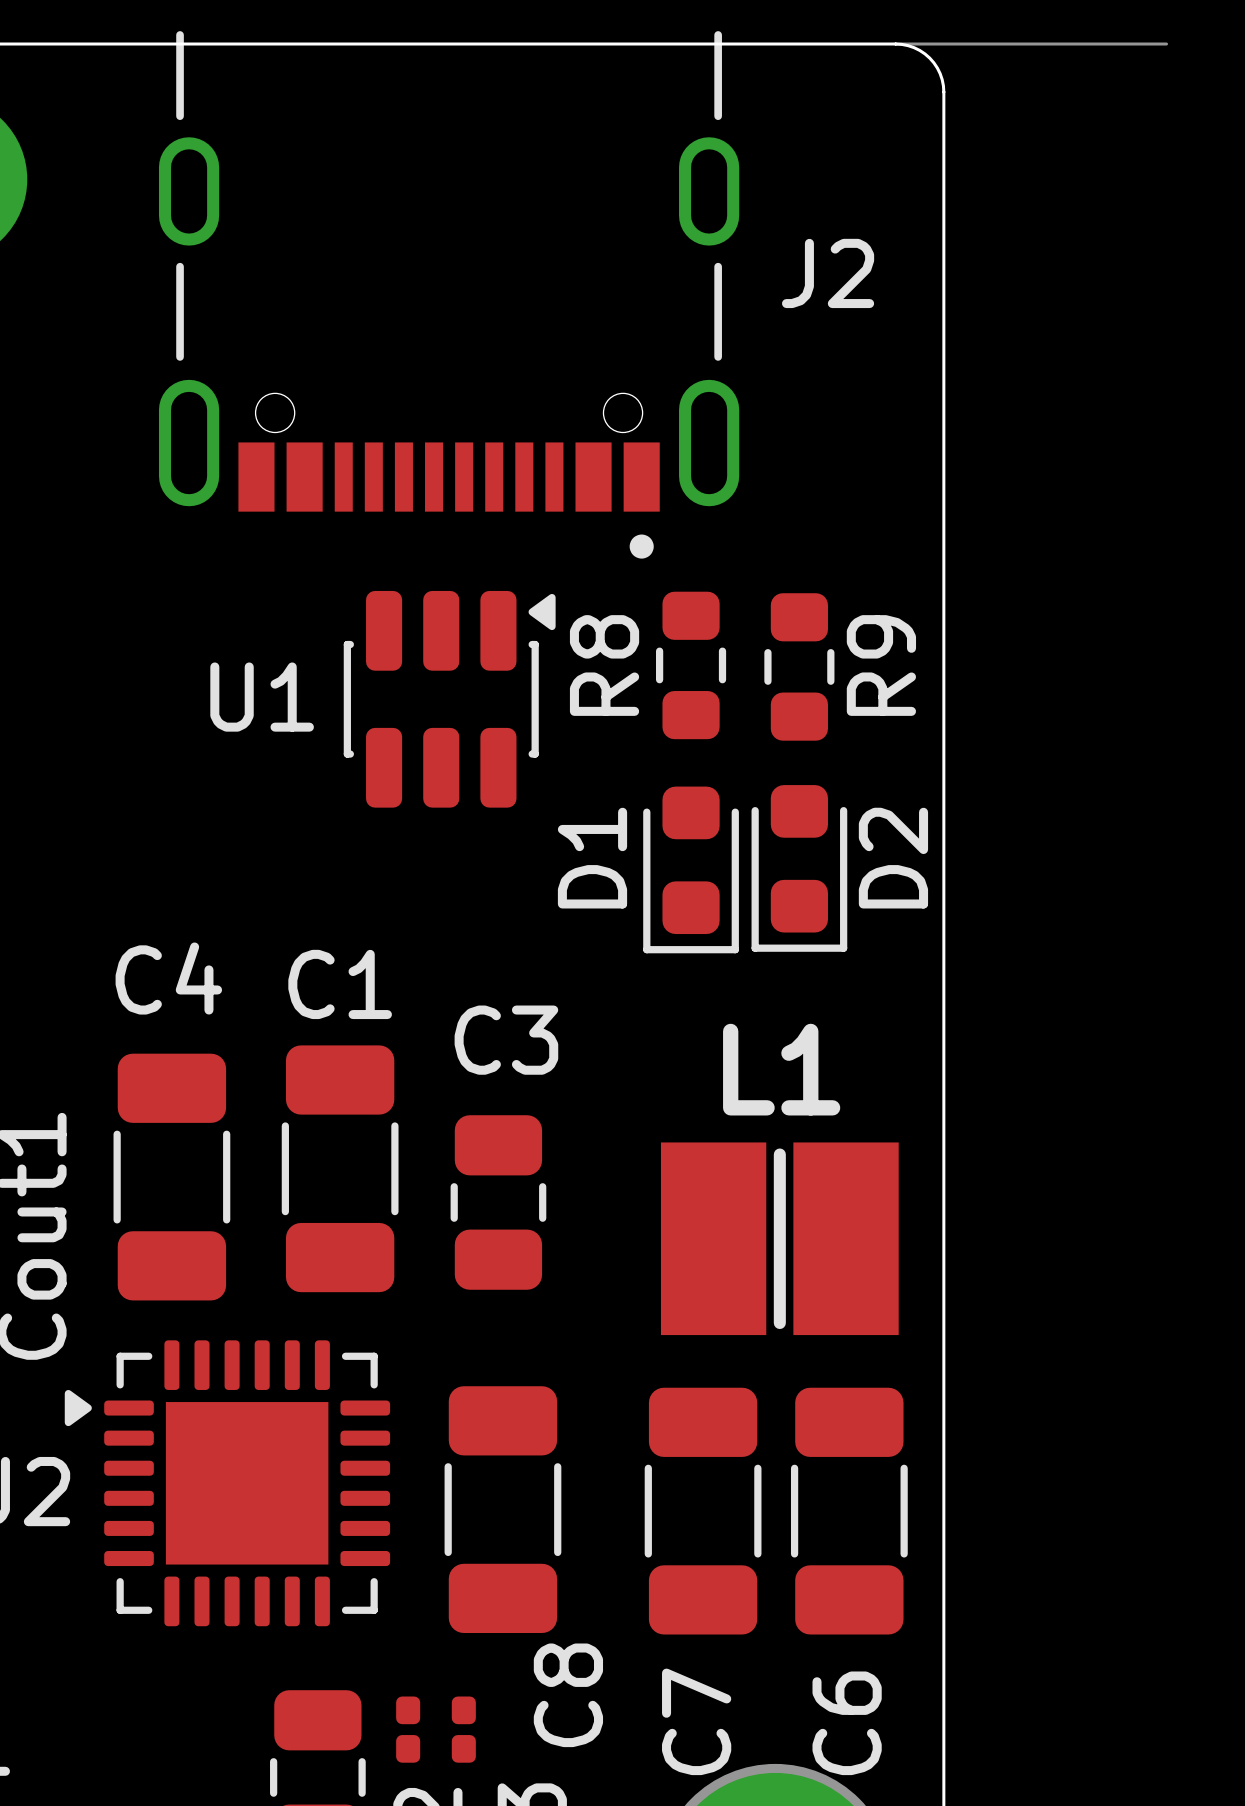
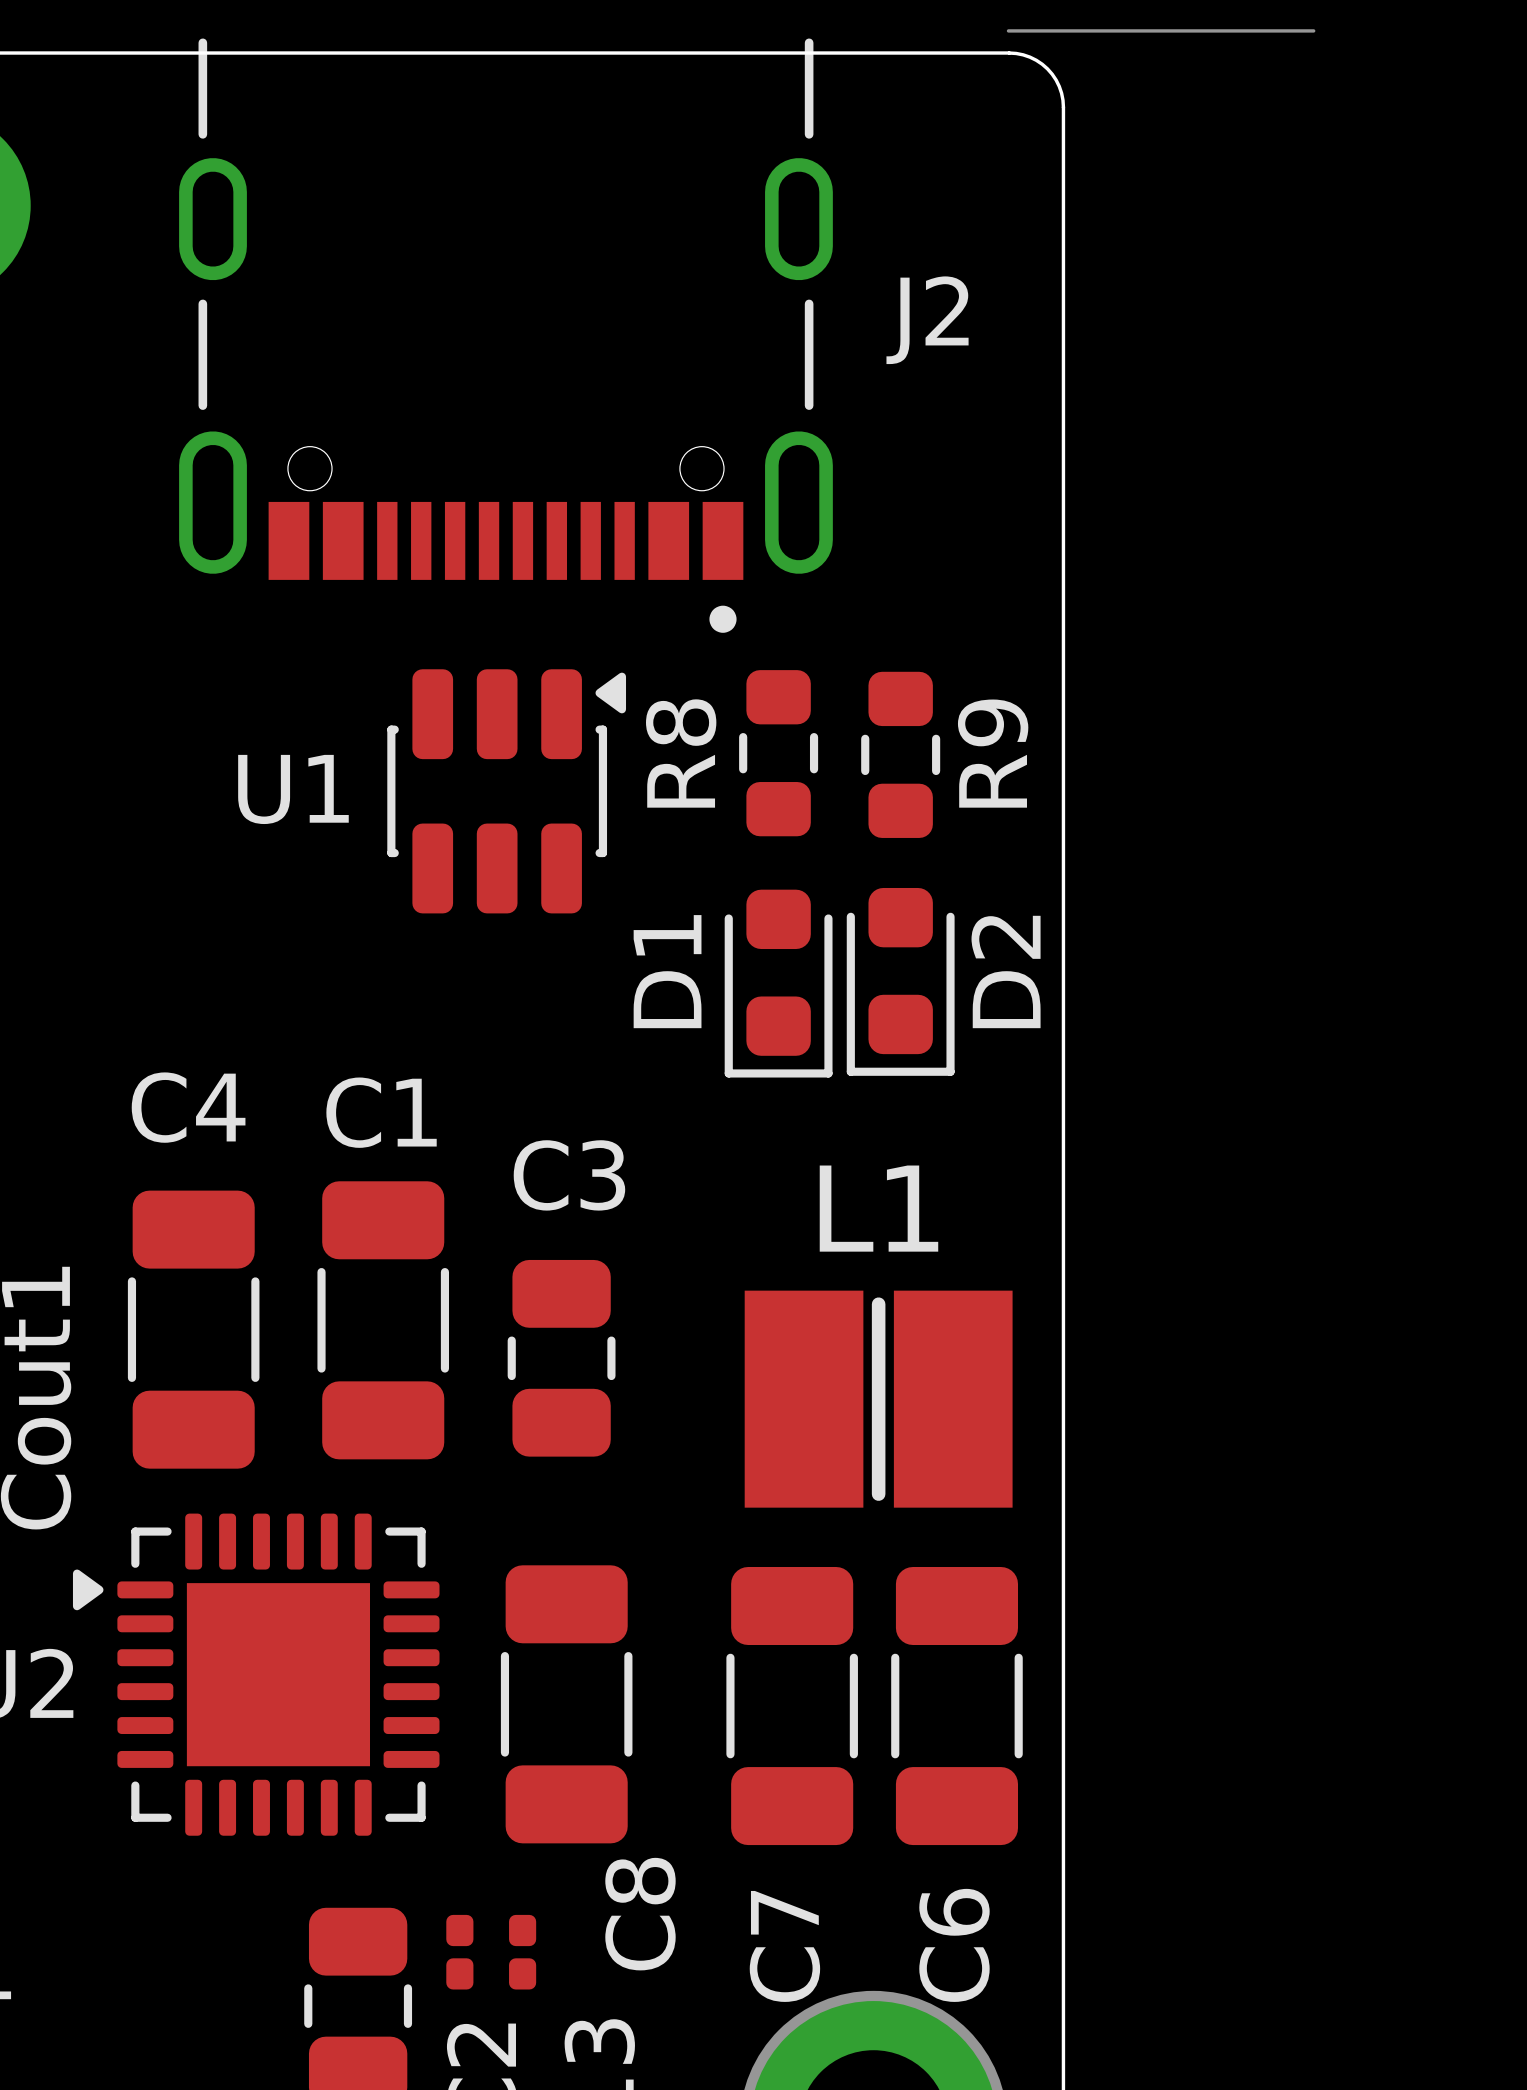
line: (895, 44) (1166, 44) -> (1008, 30) (1313, 30)

